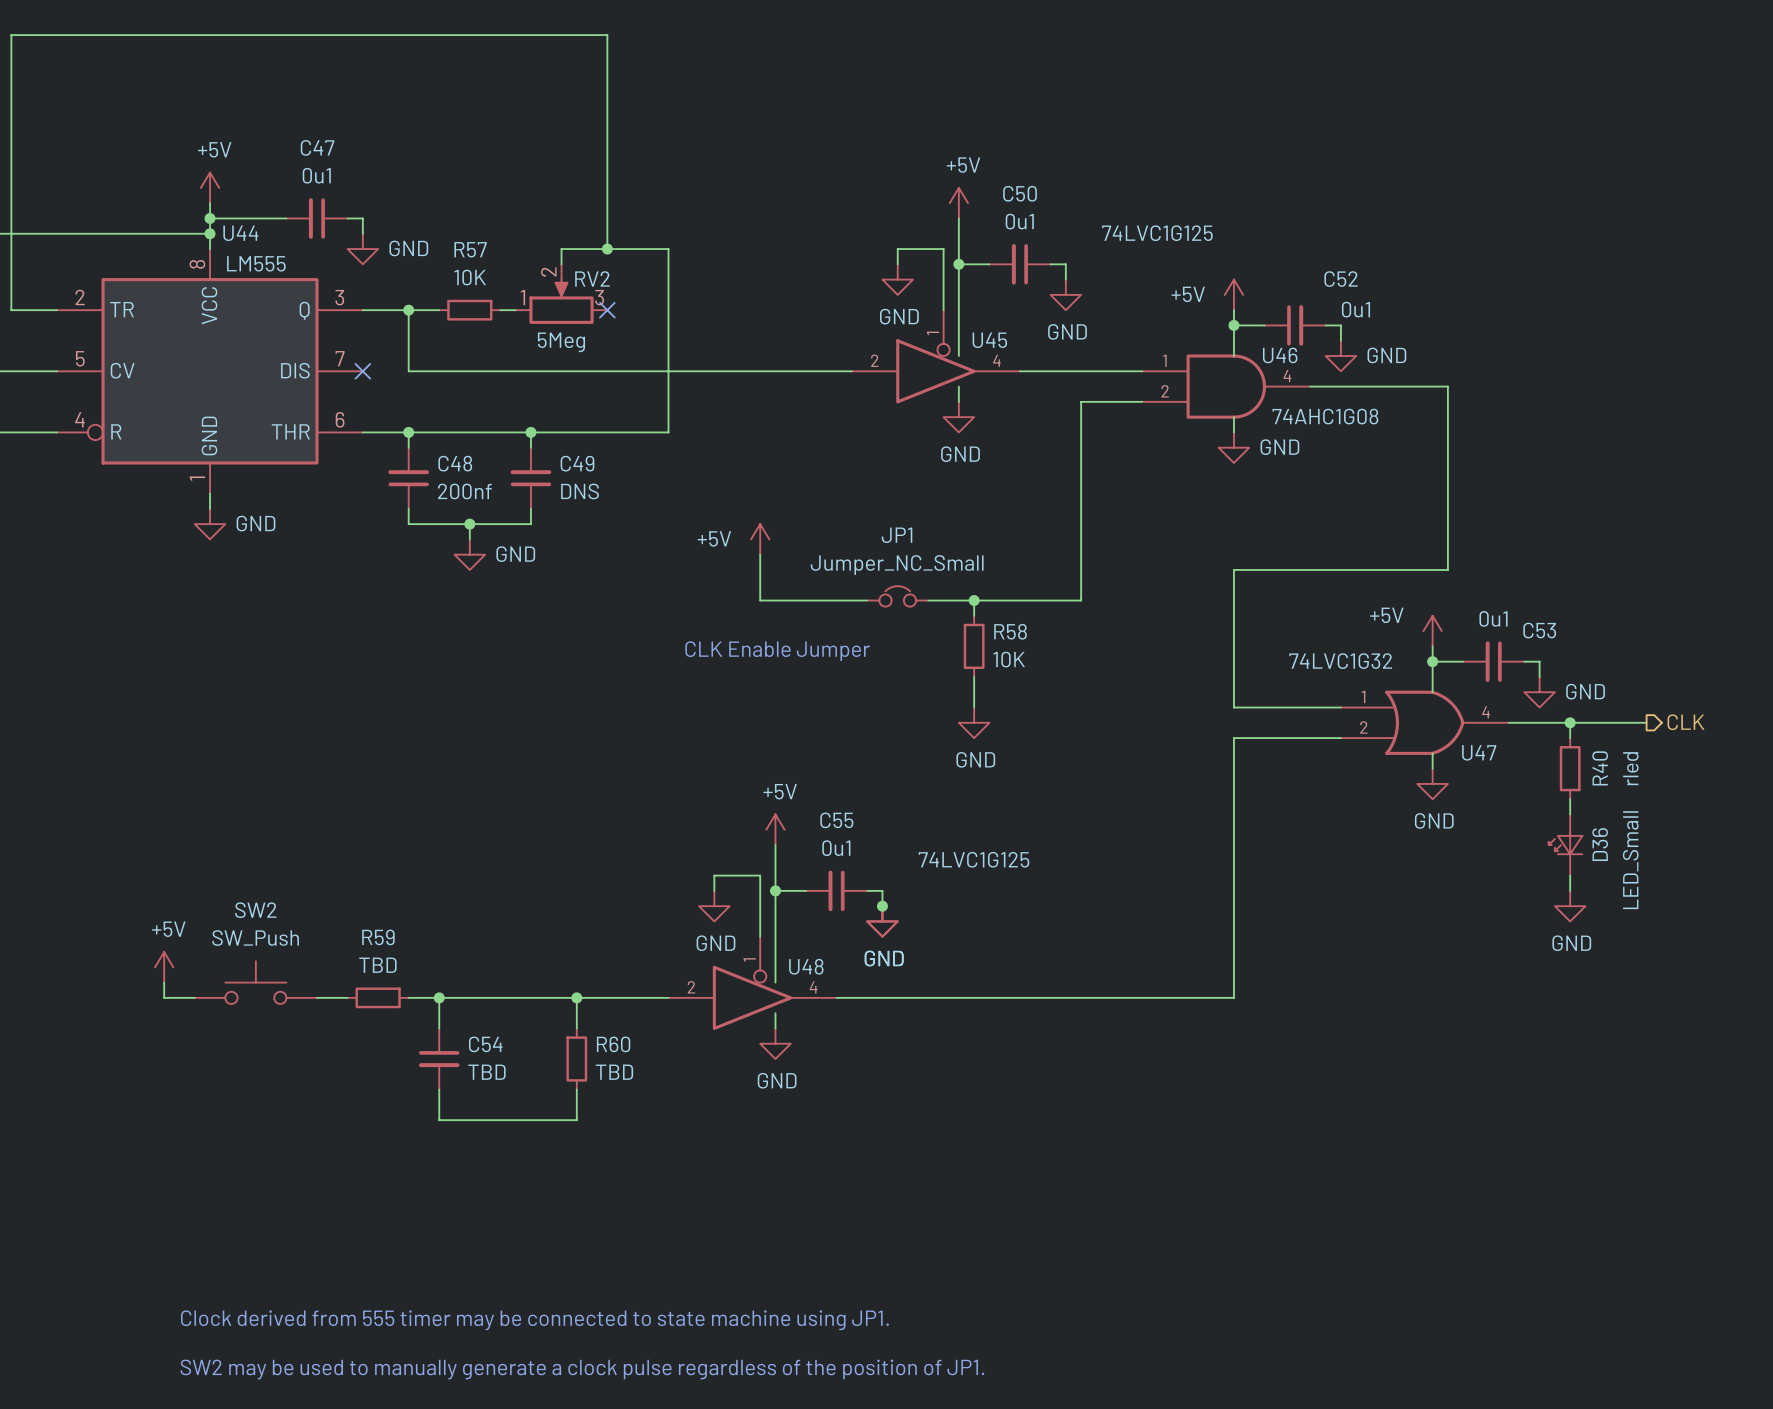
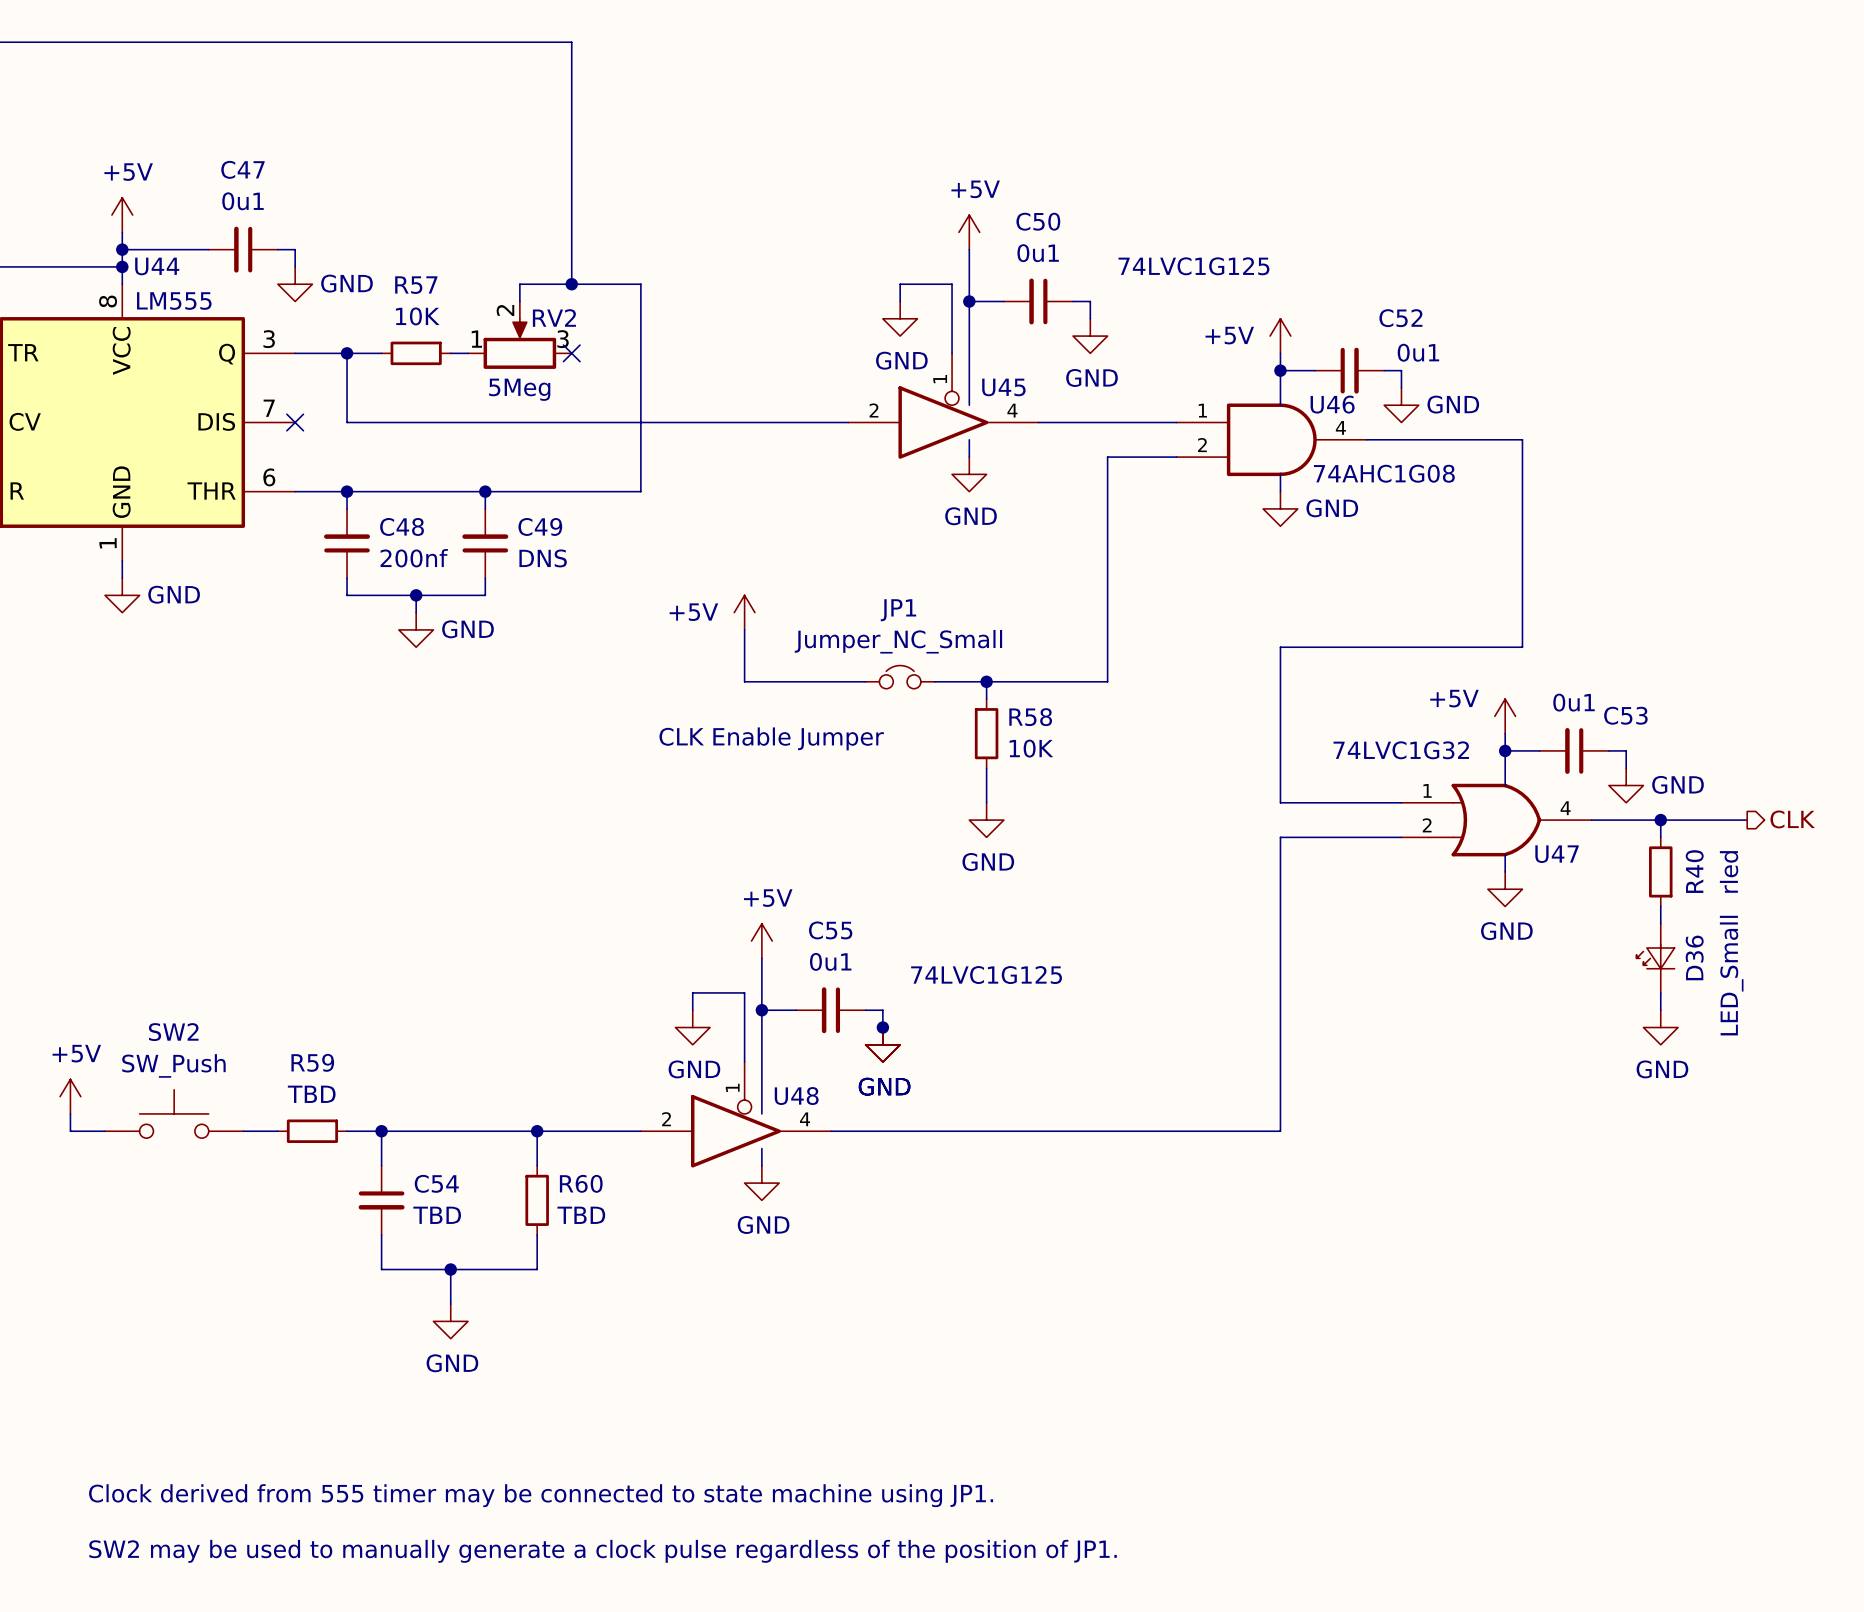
wire: none -> (450, 1269) (450, 1304)
junction: none -> (450, 1269)
power symbol: none -> GND (450, 1321)

